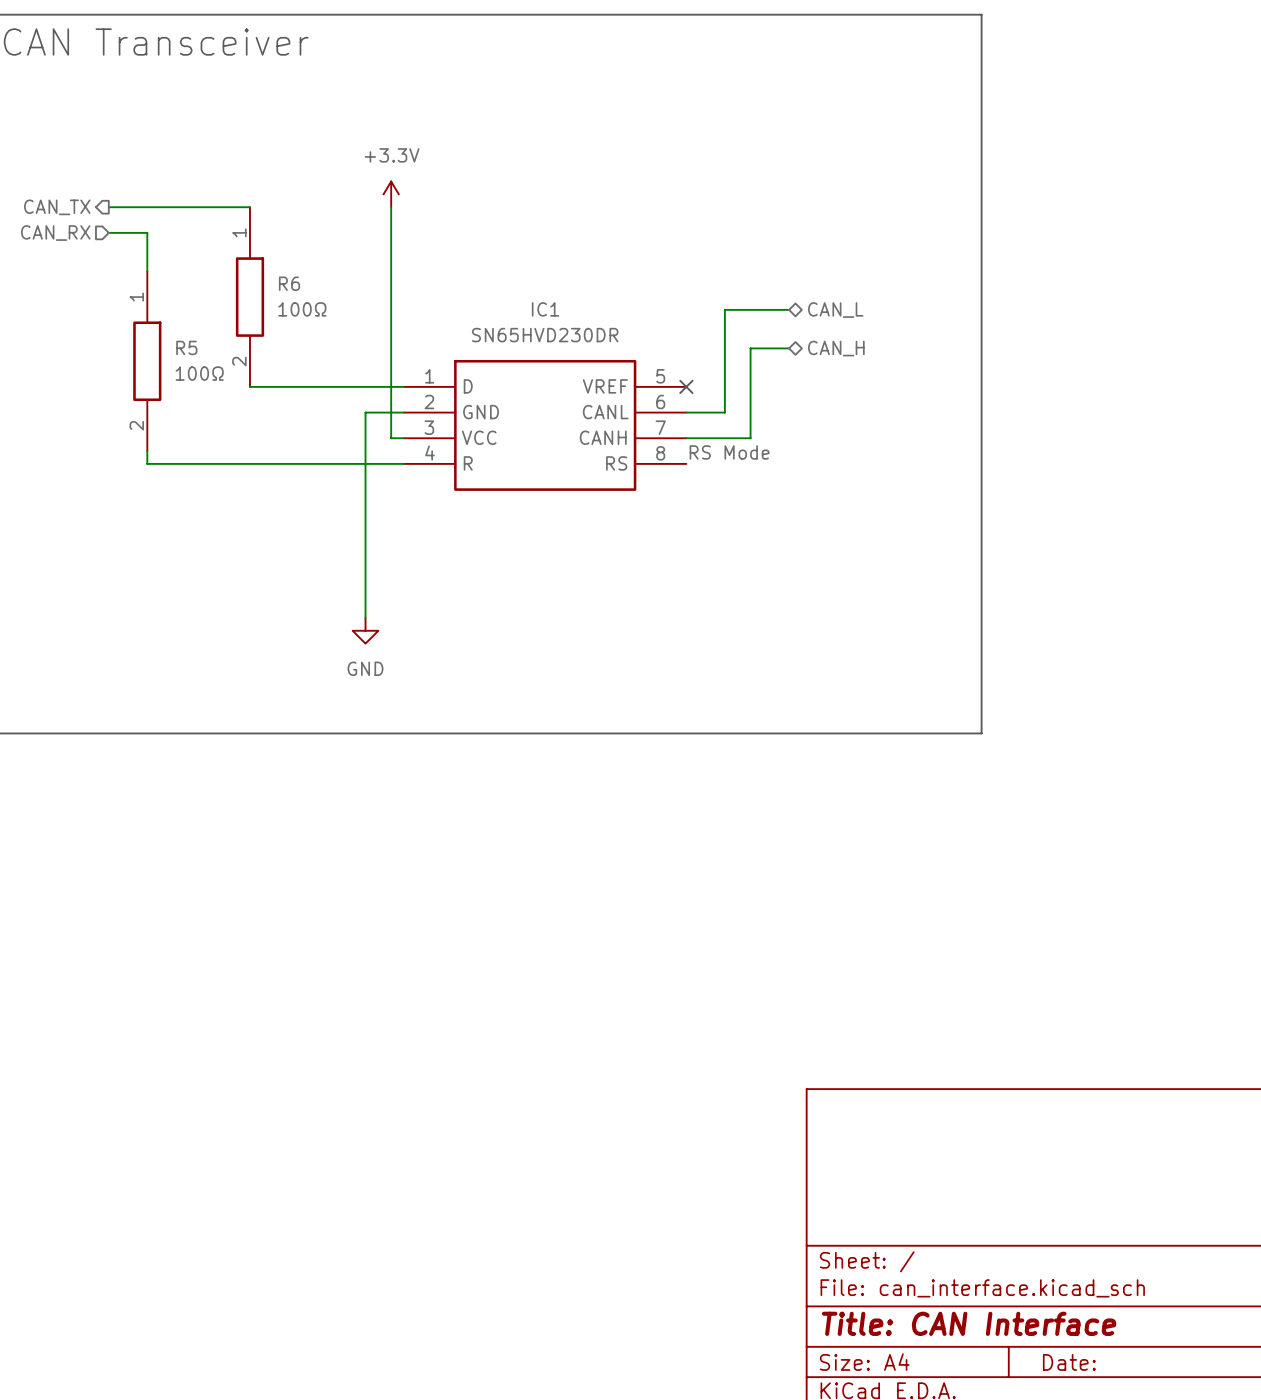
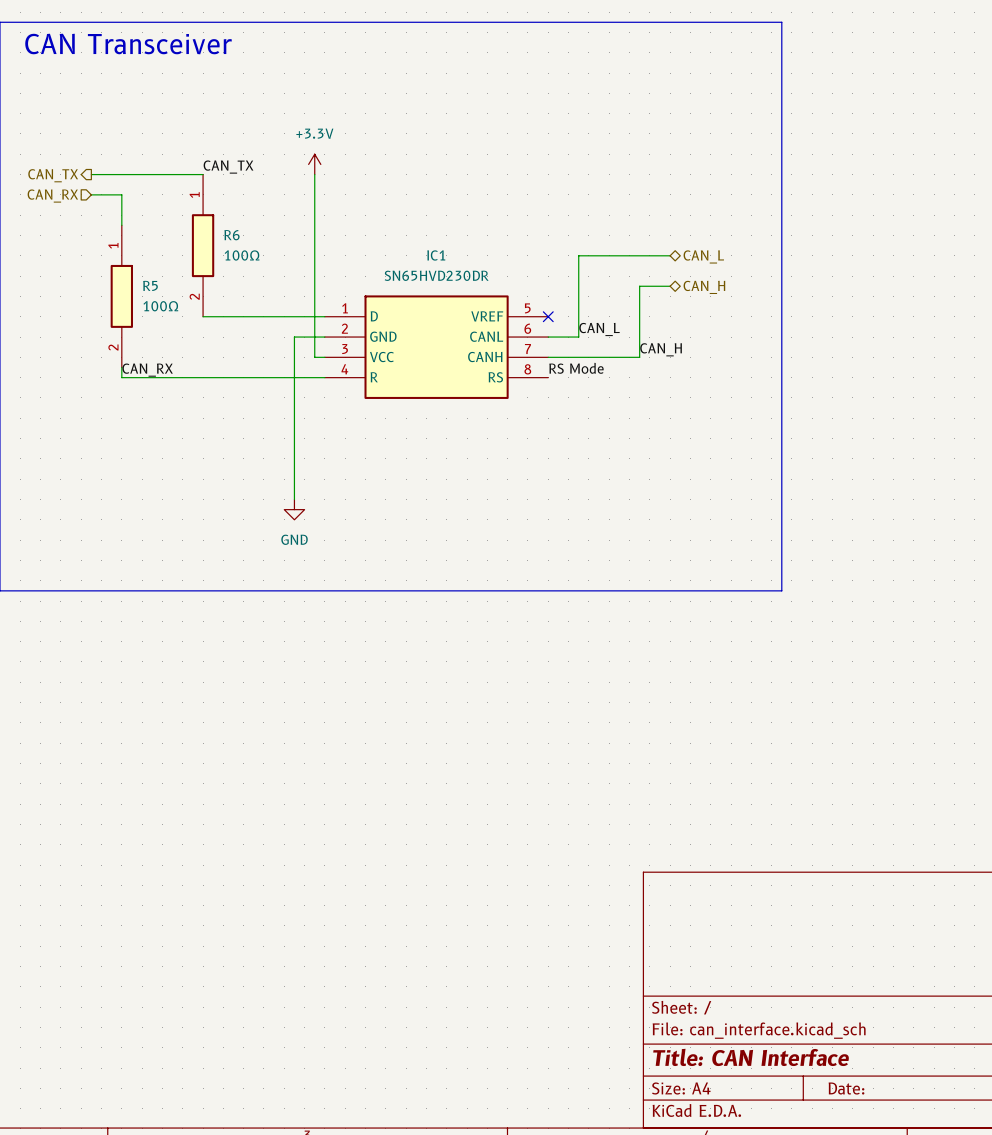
label: none -> CAN_TX (228, 167)
wire: none -> (629, 255) (670, 255)
hierarchical label position: CAN_L (835, 310) -> CAN_L (703, 256)
wire: (789, 348) (750, 348) (750, 438) -> (670, 286) (639, 286) (639, 357) (599, 357)
hierarchical label position: CAN_H (836, 348) -> CAN_H (704, 287)
label: none -> CAN_L (599, 329)
label: none -> CAN_H (661, 349)
label: none -> CAN_RX (147, 370)

